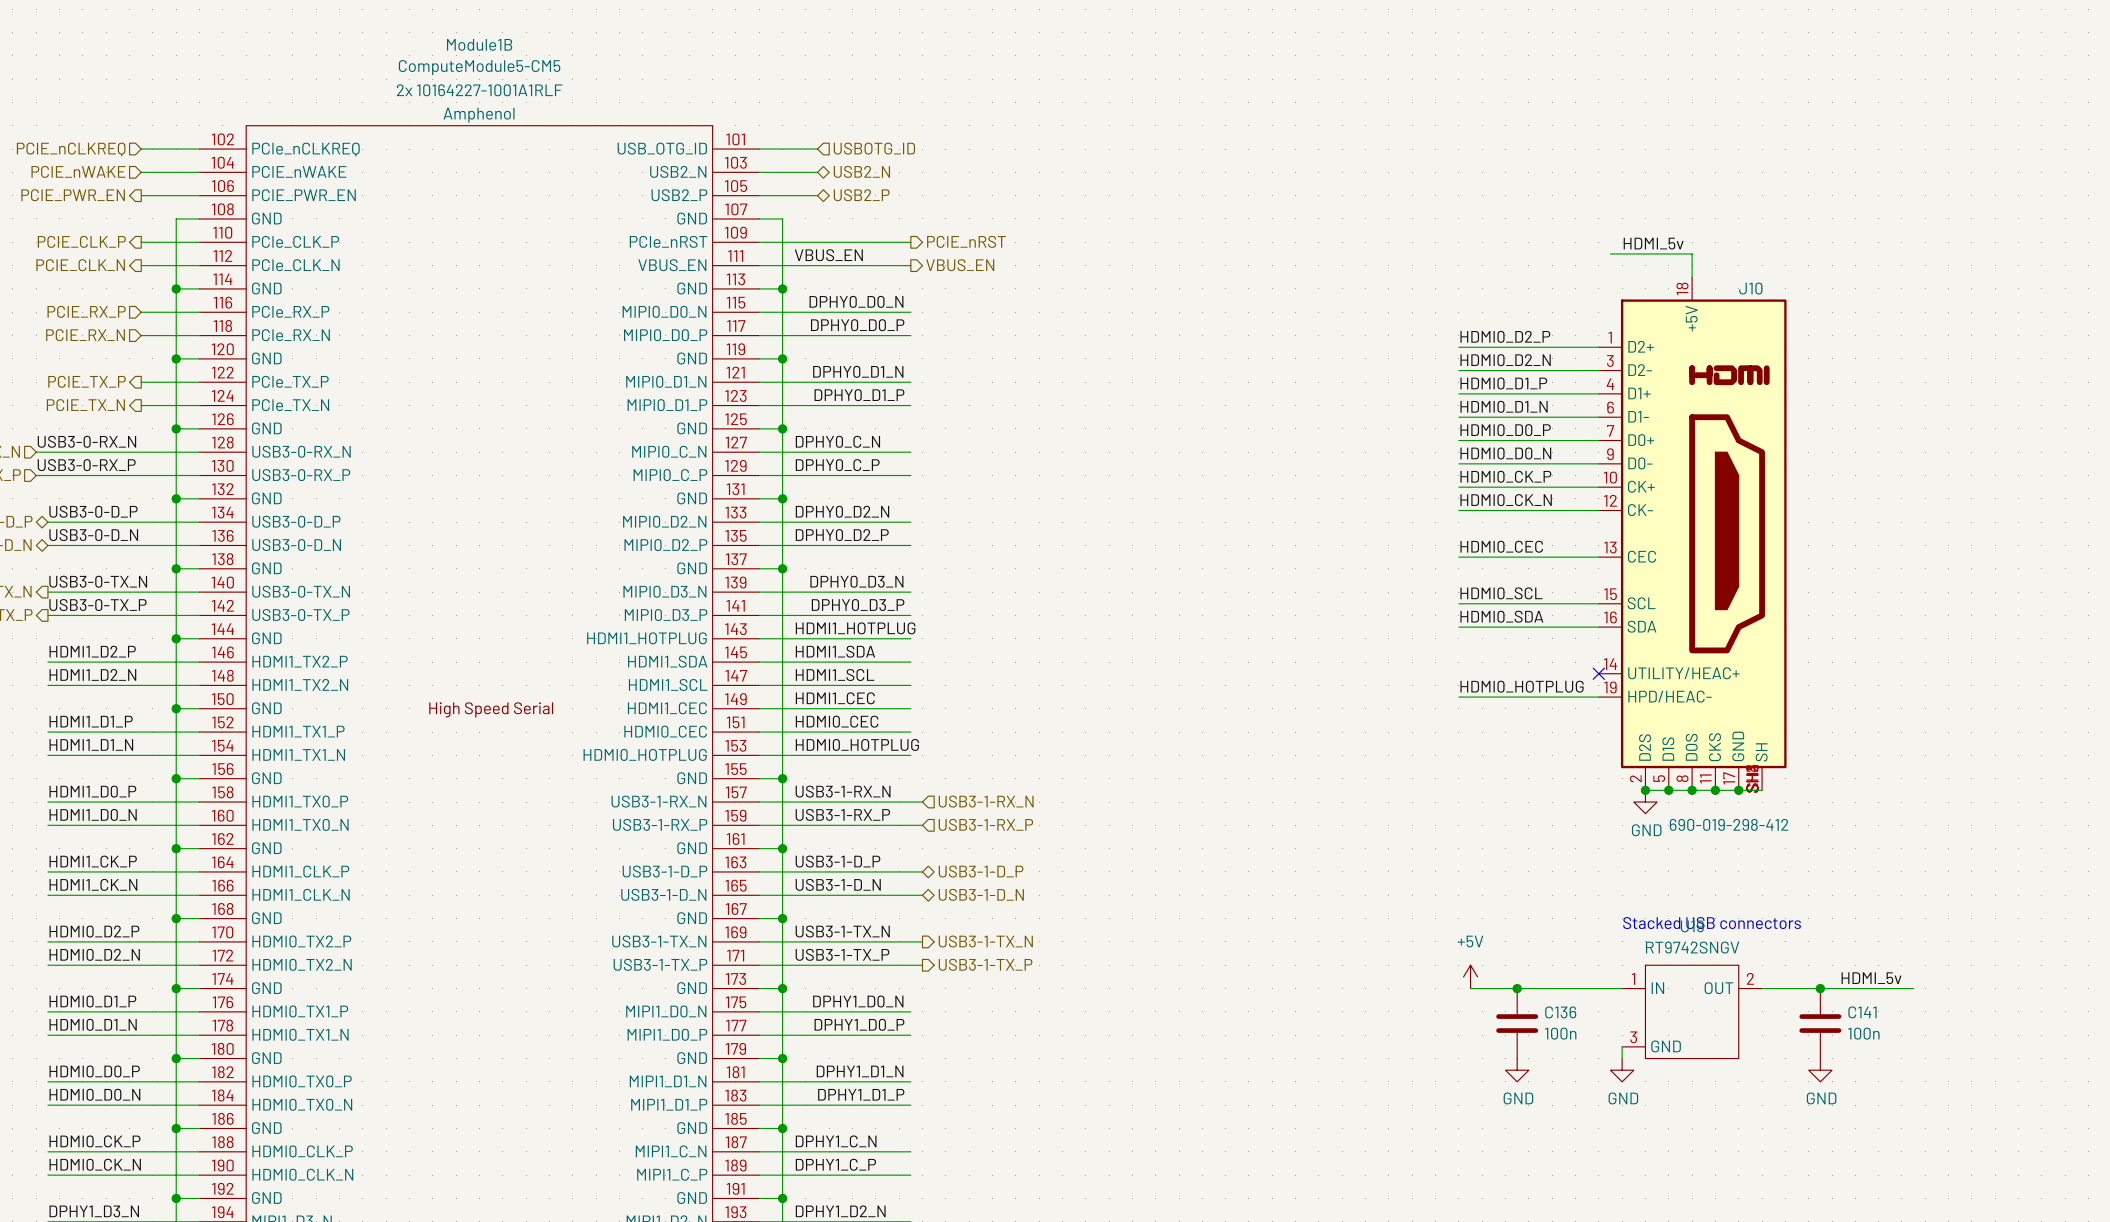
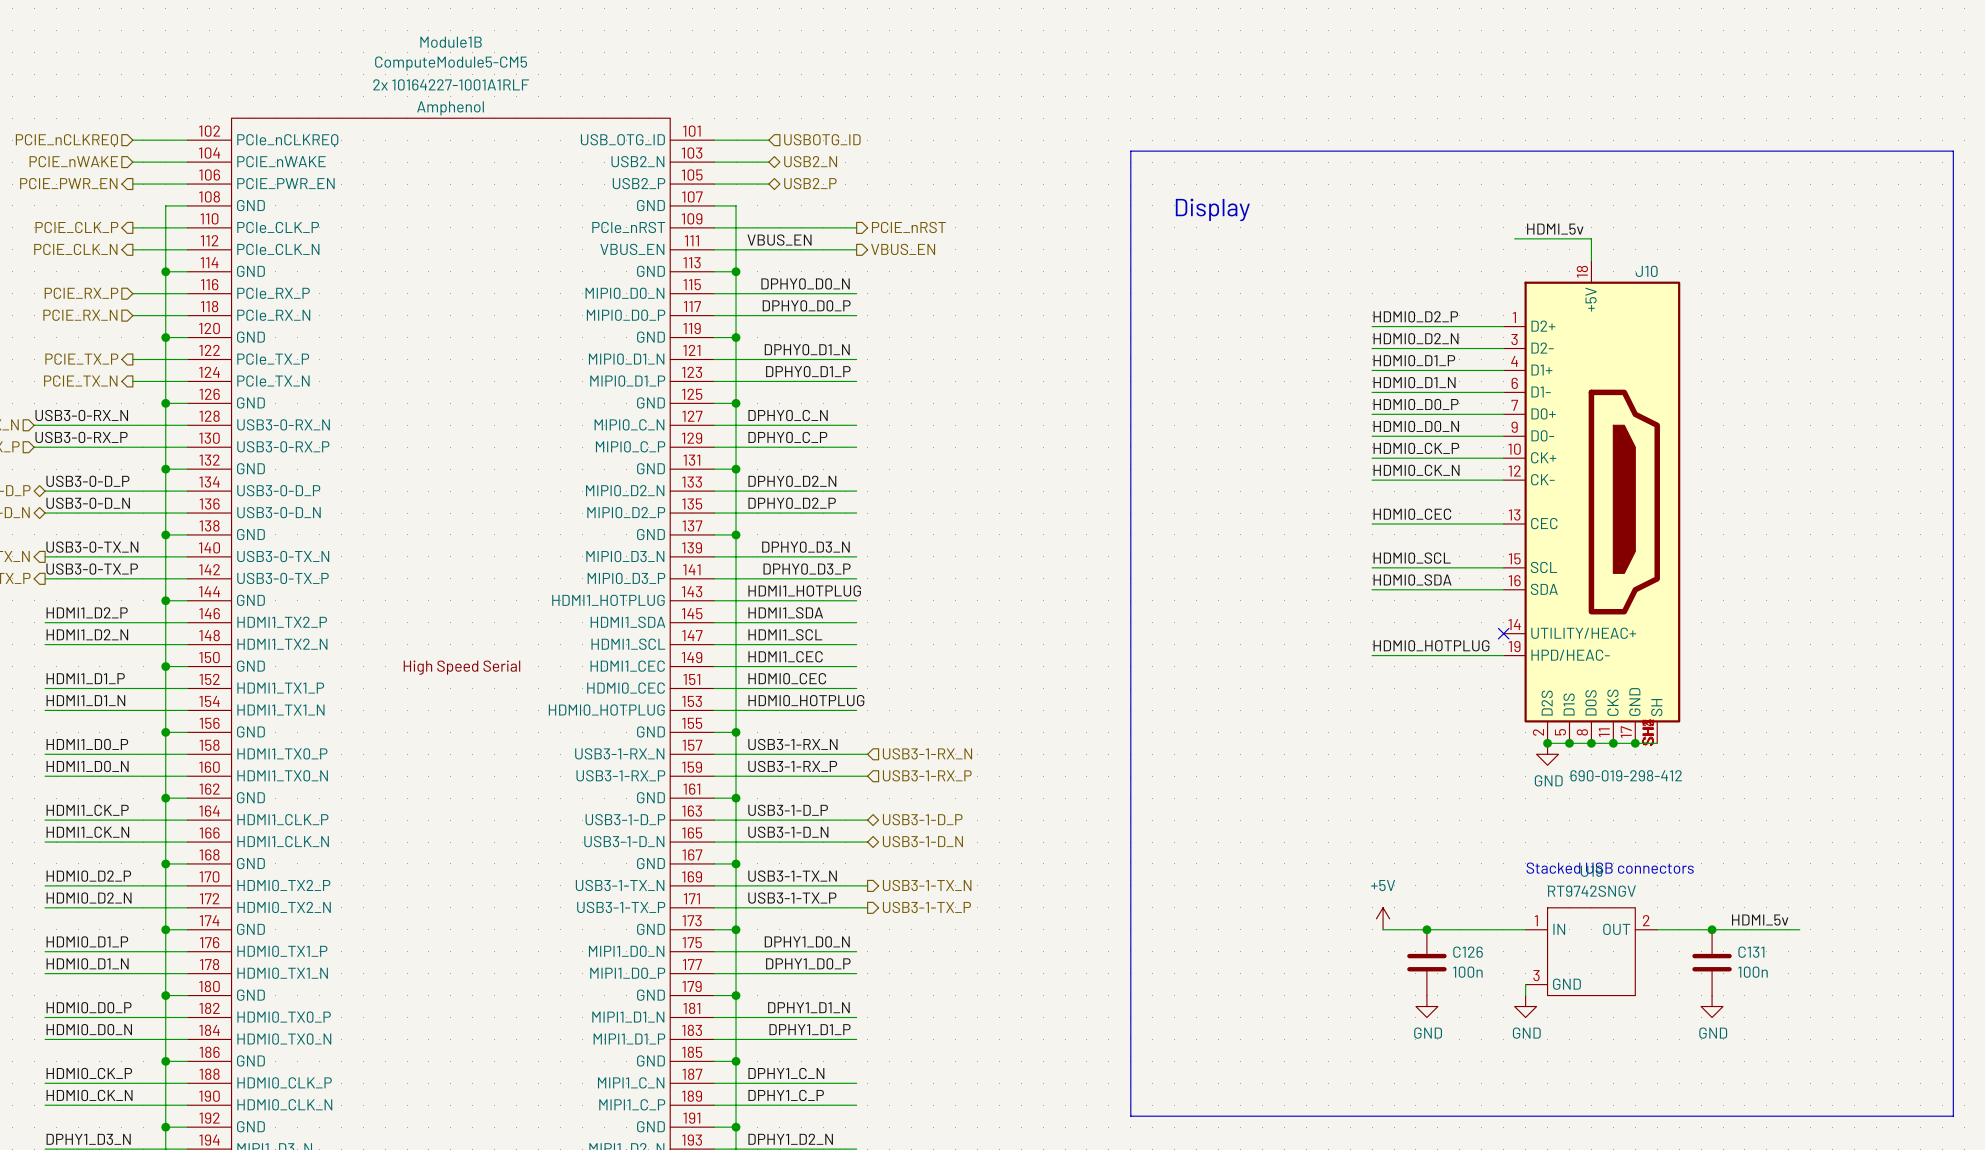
line: none -> (1130, 151) (1953, 151) (1953, 1116) (1130, 1116) (1130, 151)
text: none -> Display (1212, 209)
J10 symbol: [1598, 277, 1787, 791] -> [1503, 260, 1681, 744]
C136 name: C136 (1560, 1012) -> C126 (1468, 952)
C141 name: C141 (1862, 1012) -> C131 (1751, 952)

